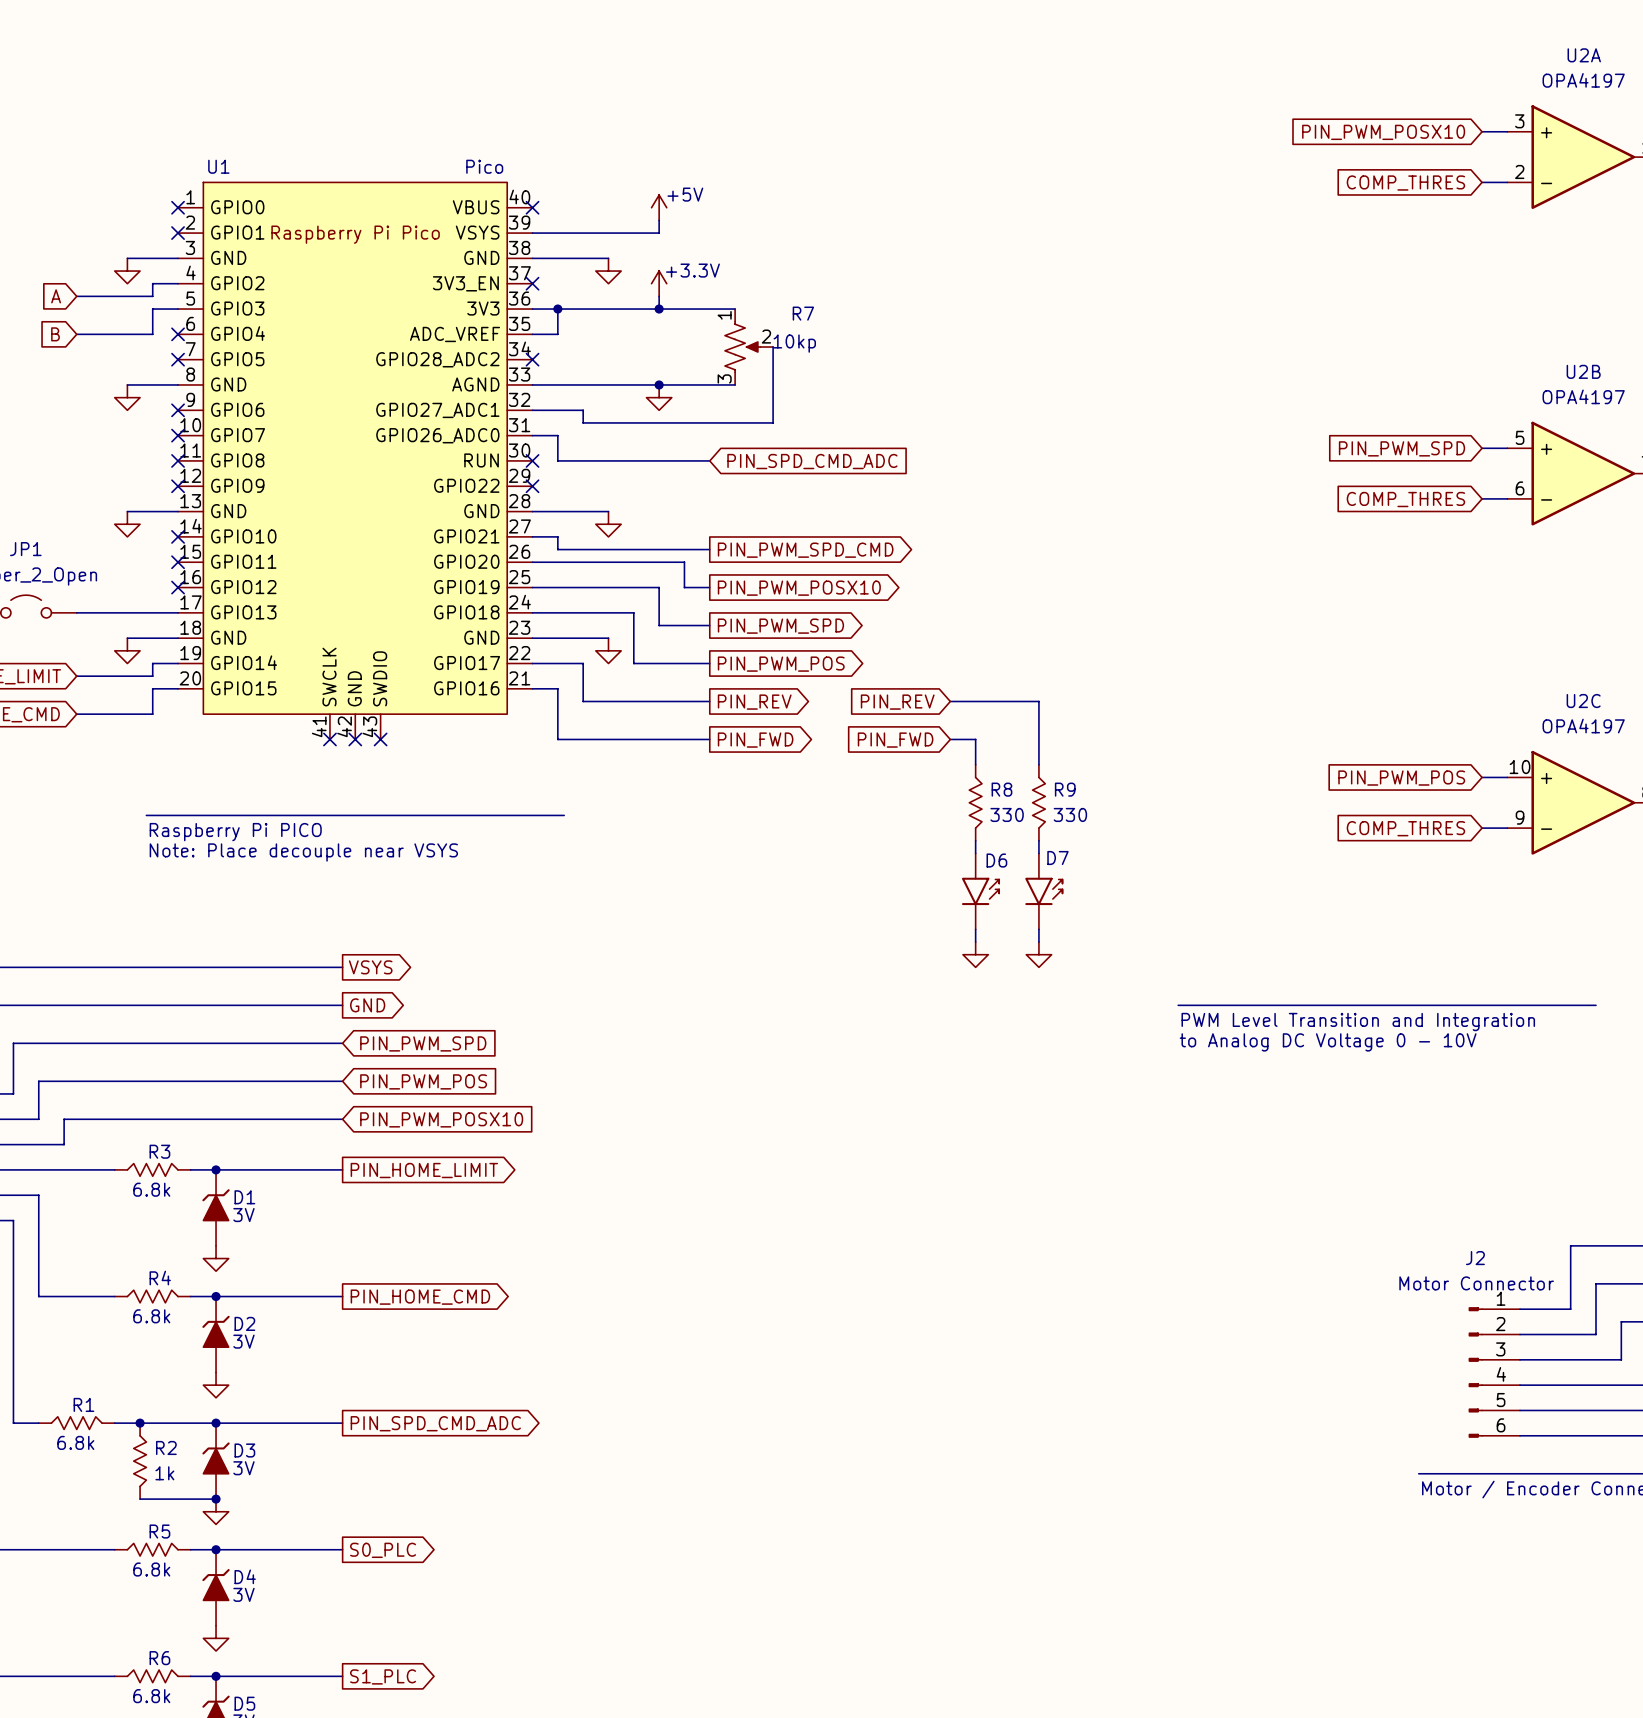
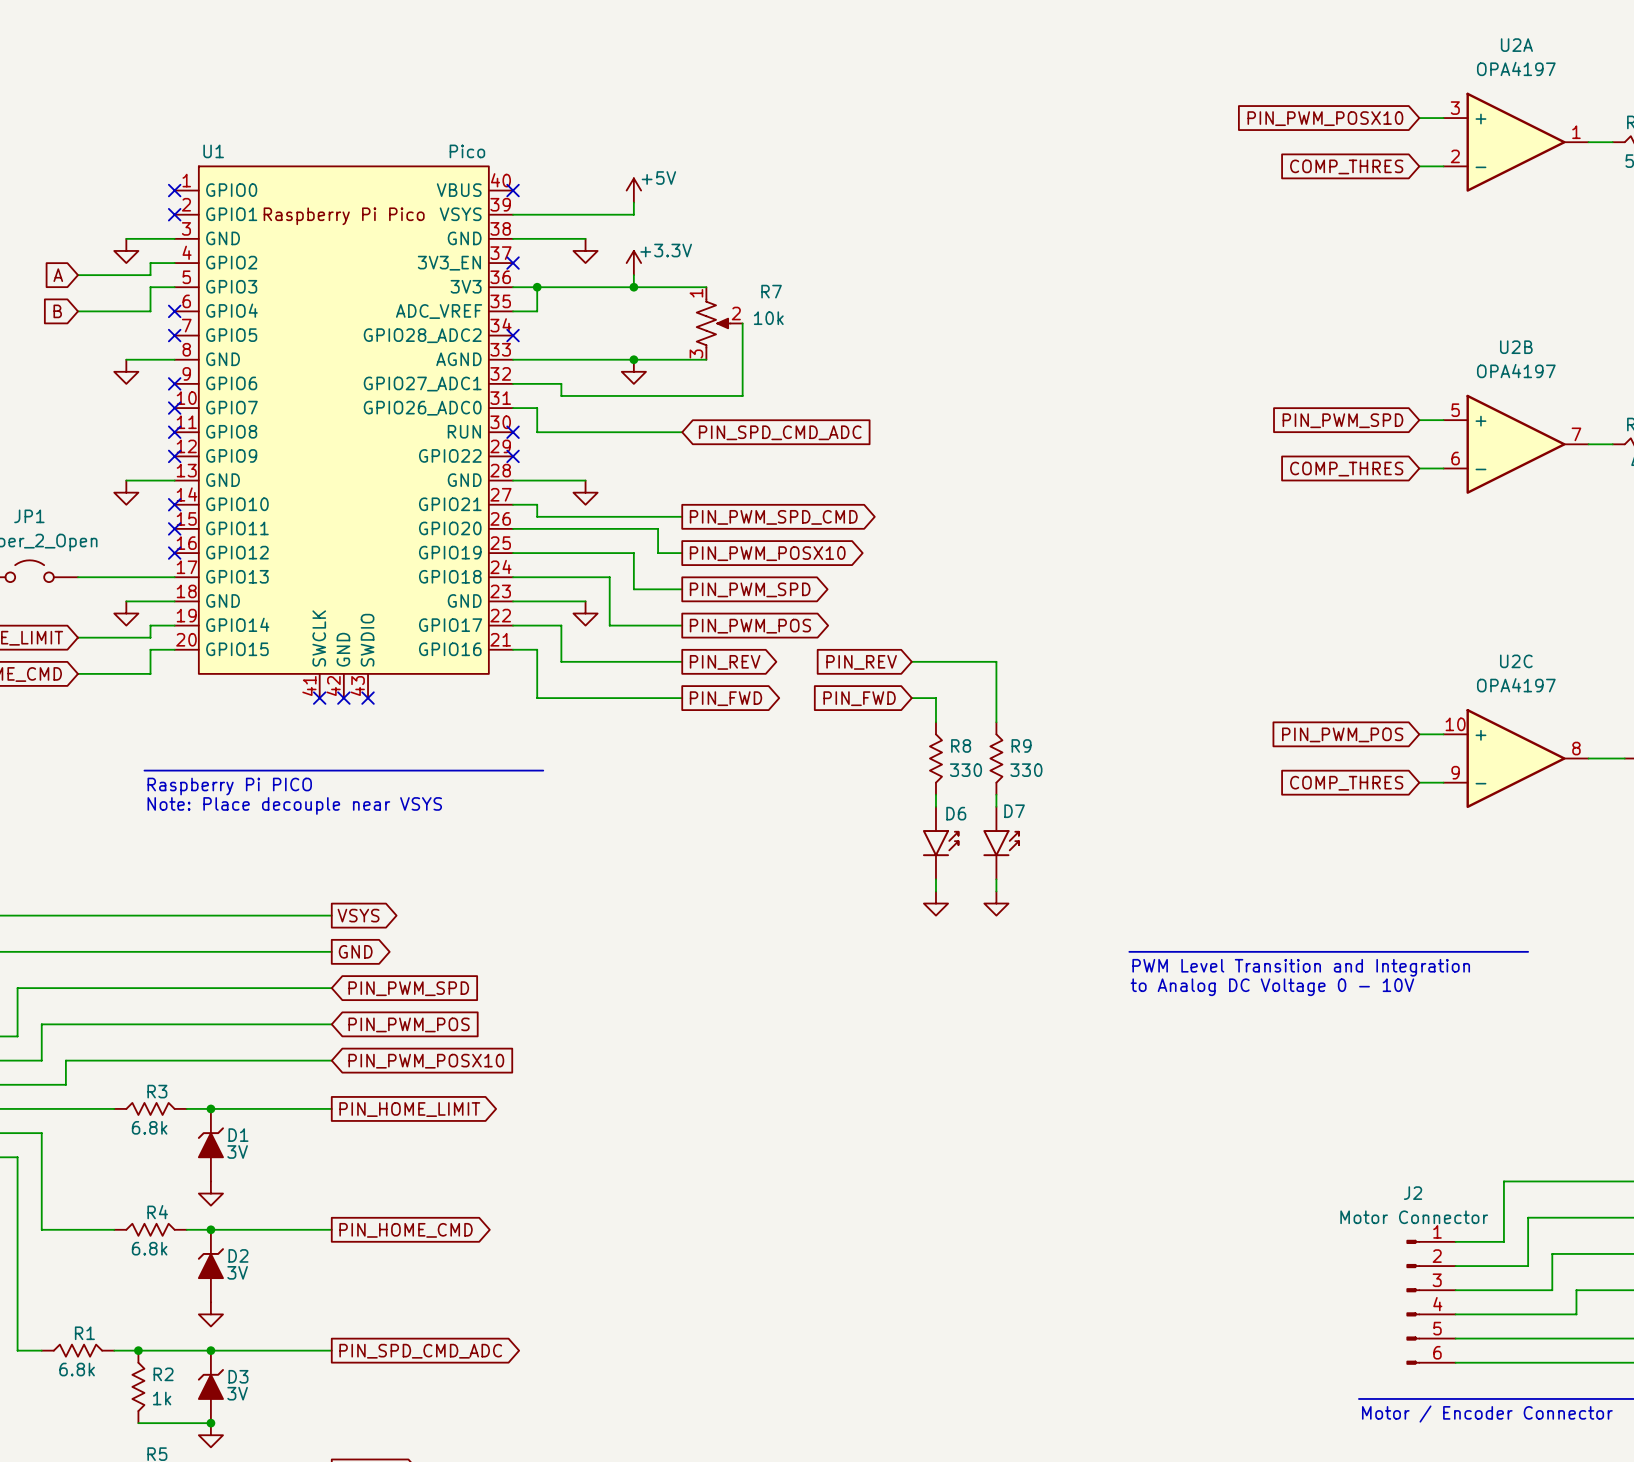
R7 value: 10kp (794, 343) -> 10k (768, 318)

